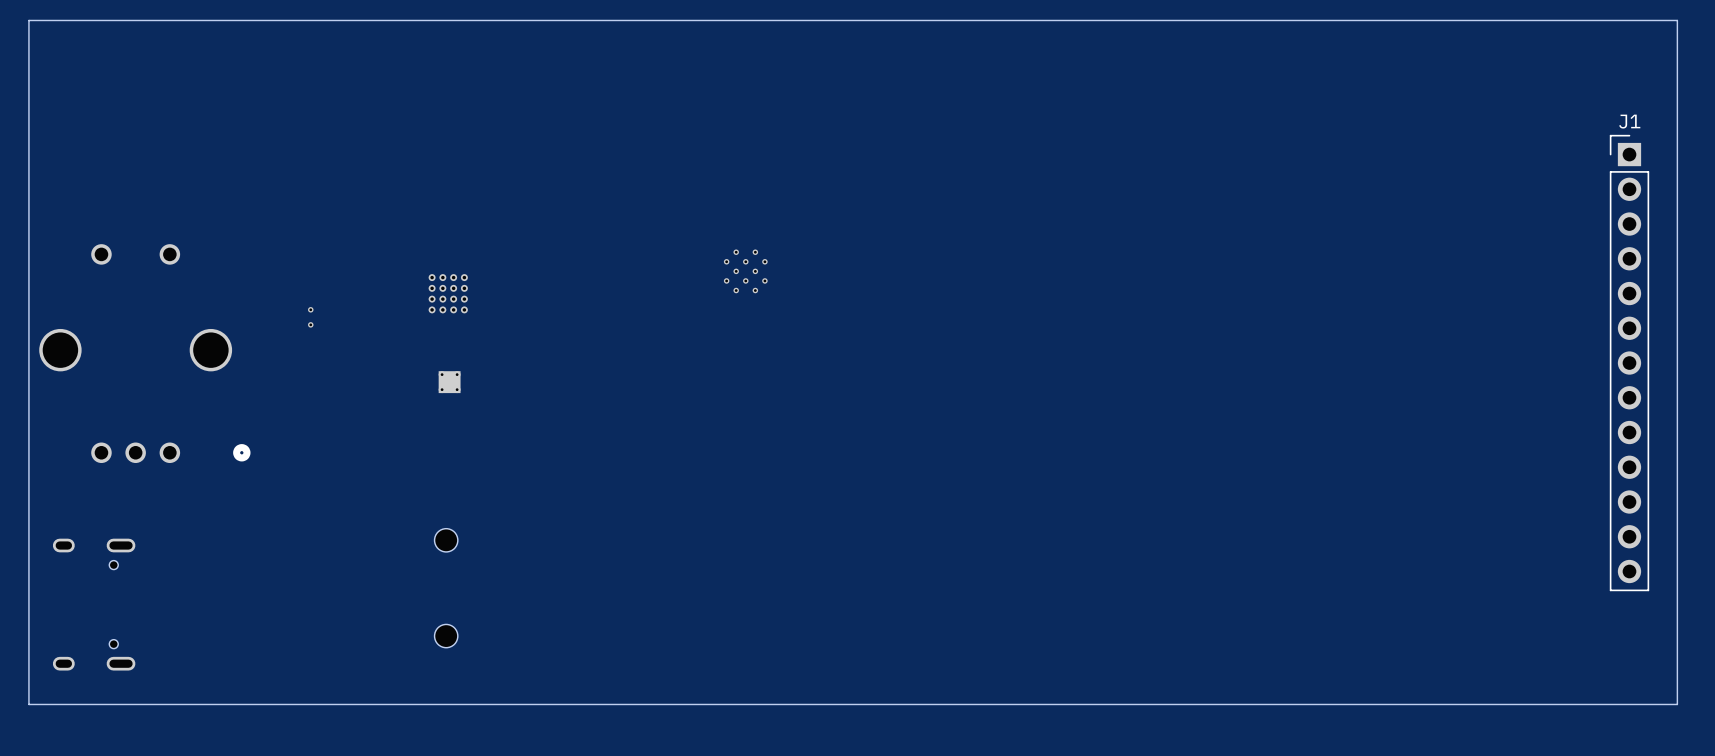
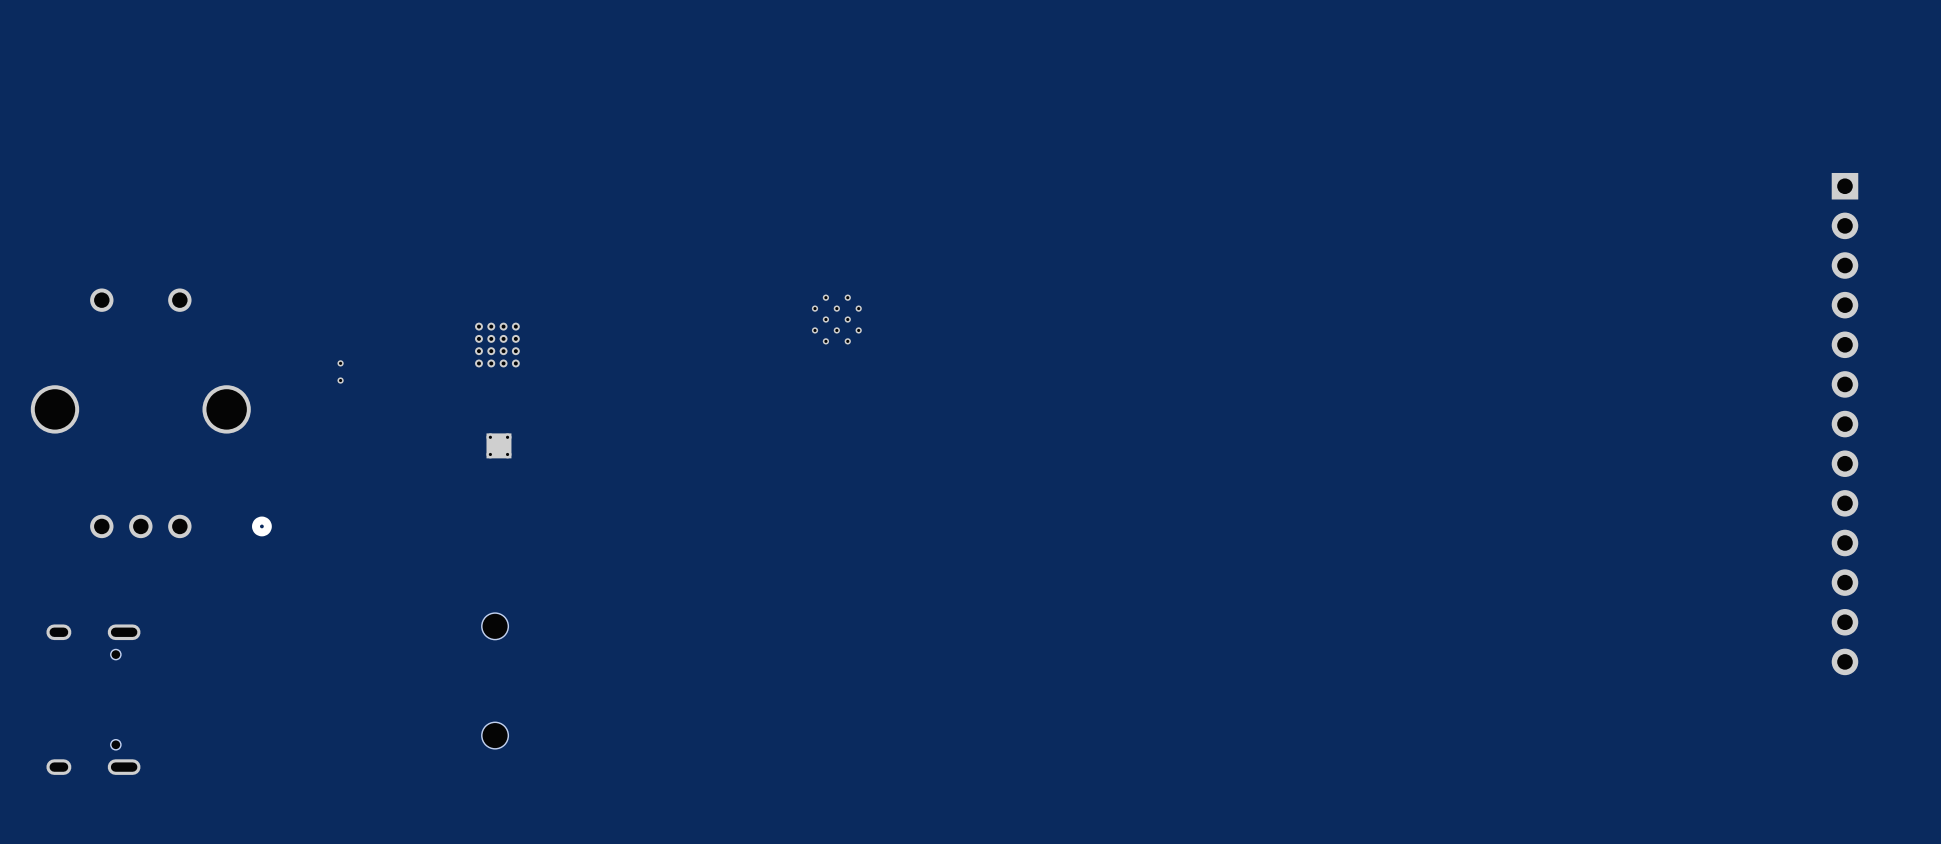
board edge: (1677, 20) (28, 20) (28, 704) (1677, 704) (1677, 20) -> none
J1 side: bottom (1629, 363) -> top (1844, 424)

